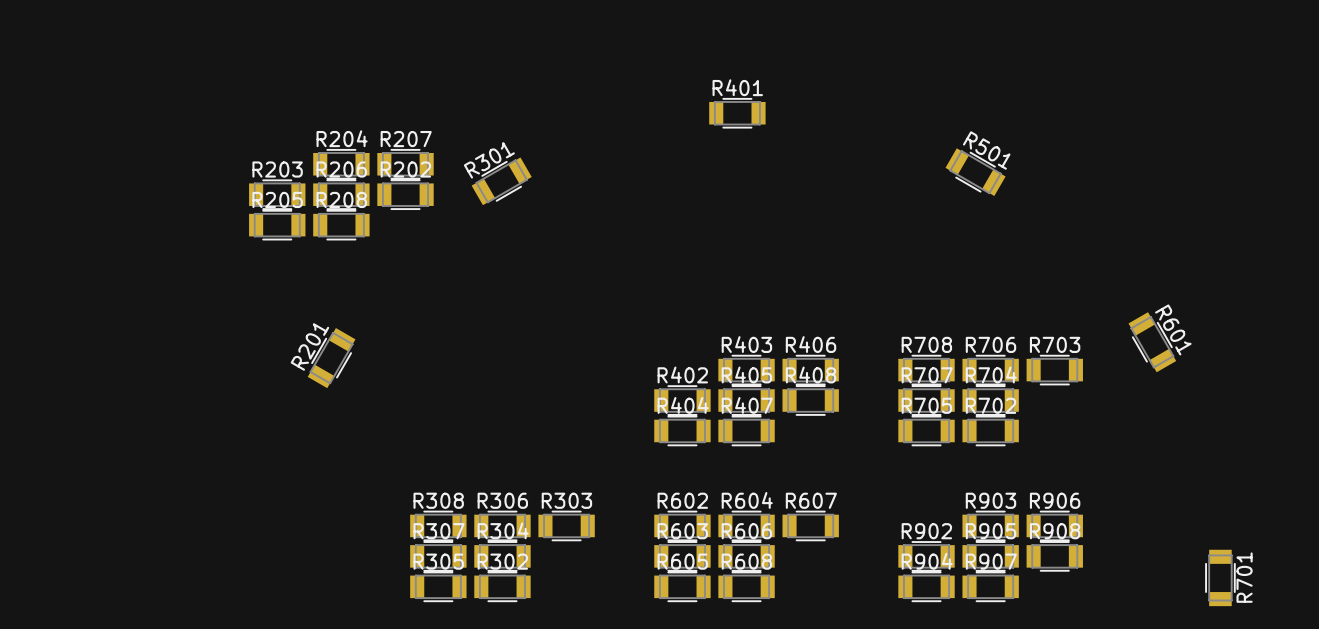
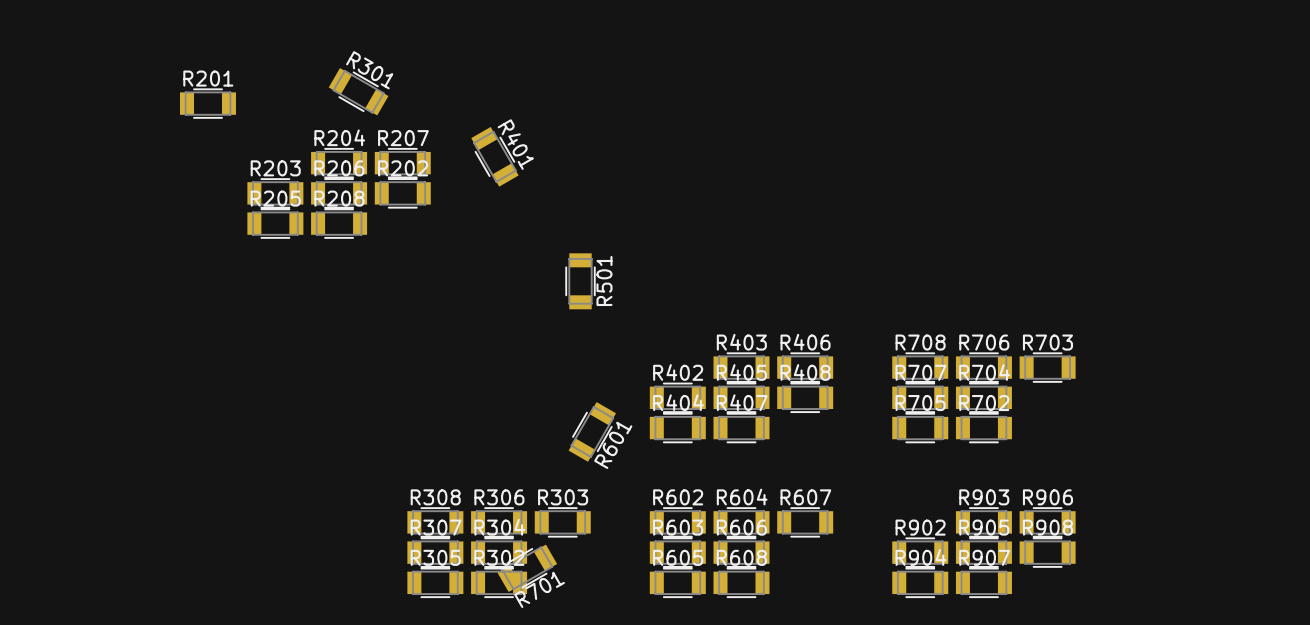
R401 rotation: 0° (737, 113) -> 60° clockwise (494, 156)
R401 position: (737, 113) -> (494, 156)
R501 rotation: 0° (975, 172) -> 60° clockwise (580, 281)
R501 position: (975, 172) -> (580, 281)
R301 rotation: 0° (501, 181) -> 60° clockwise (358, 91)
R301 position: (501, 181) -> (358, 91)
R601 rotation: 0° (1152, 342) -> 60° clockwise (592, 431)
R601 position: (1152, 342) -> (592, 431)
R201 rotation: 0° (331, 358) -> 60° clockwise (207, 103)
R201 position: (331, 358) -> (207, 103)
R701 rotation: 0° (1220, 577) -> 60° clockwise (527, 568)
R701 position: (1220, 577) -> (527, 568)

